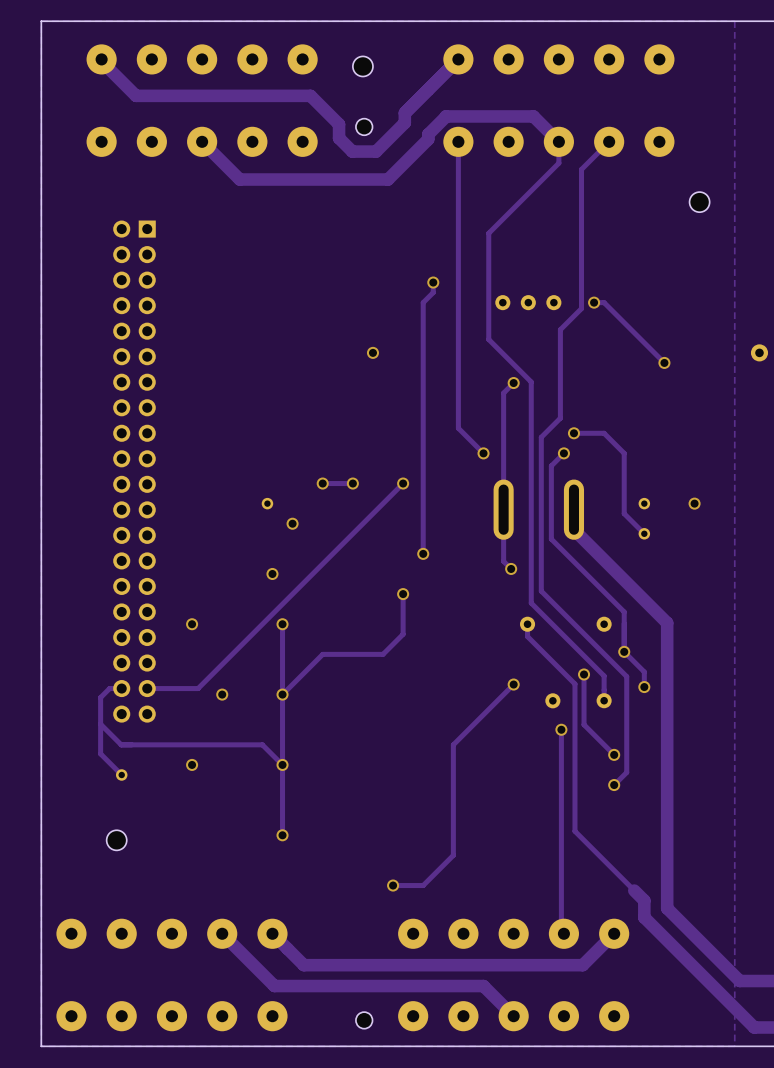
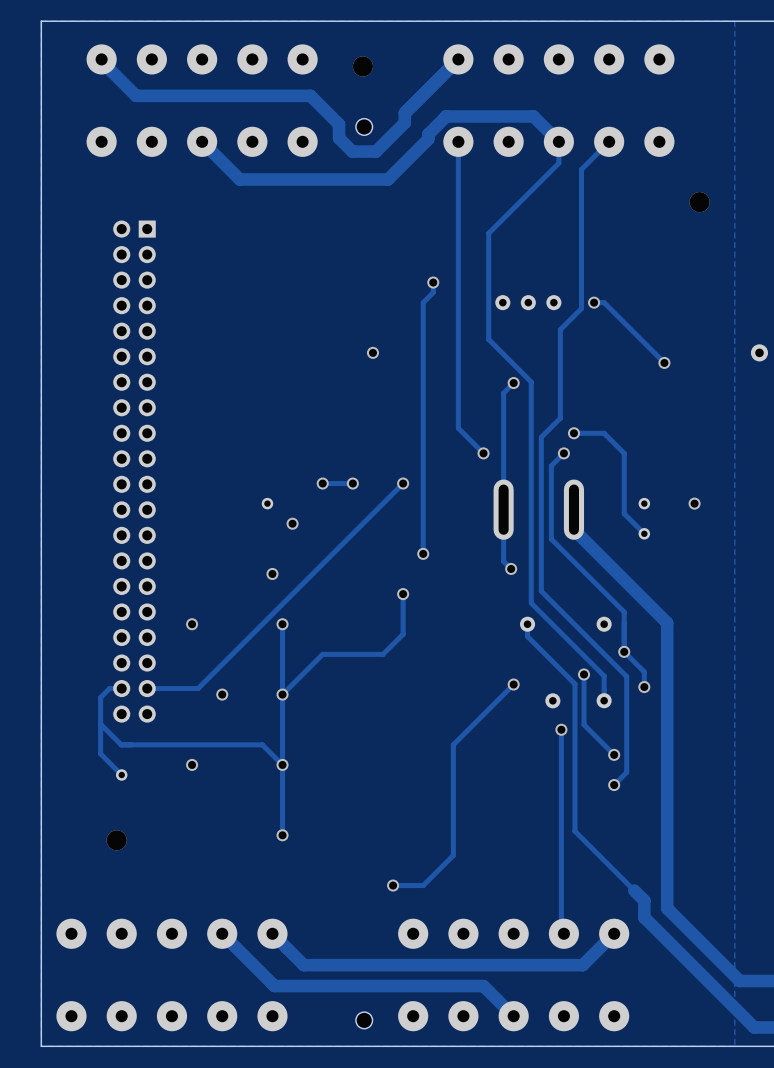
part footprint: [352, 56, 373, 77] -> [352, 56, 373, 77]
part footprint: [689, 192, 710, 213] -> [689, 192, 710, 213]
part footprint: [106, 830, 127, 851] -> [106, 830, 127, 851]

